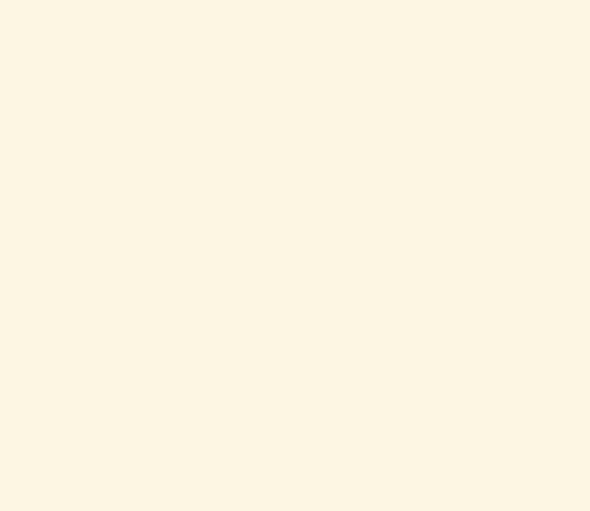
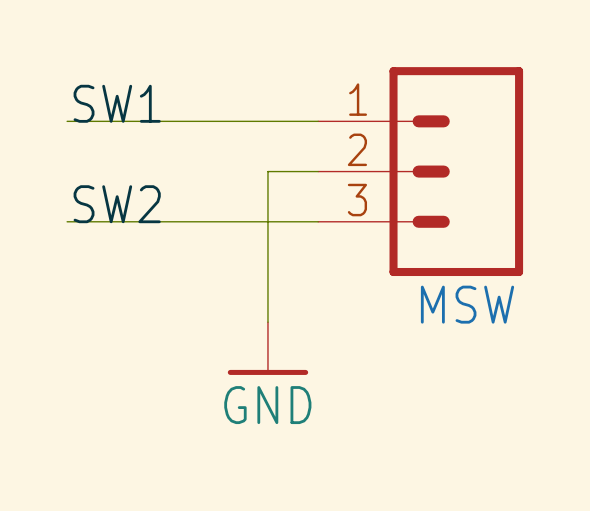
label: none -> SW1 (117, 103)
wire: none -> (67, 121) (318, 121)
wire: none -> (318, 171) (267, 171) (267, 322)
MSW: none -> (420, 171)
label: none -> SW2 (117, 204)
wire: none -> (67, 221) (318, 221)
power symbol: none -> GND (267, 348)

